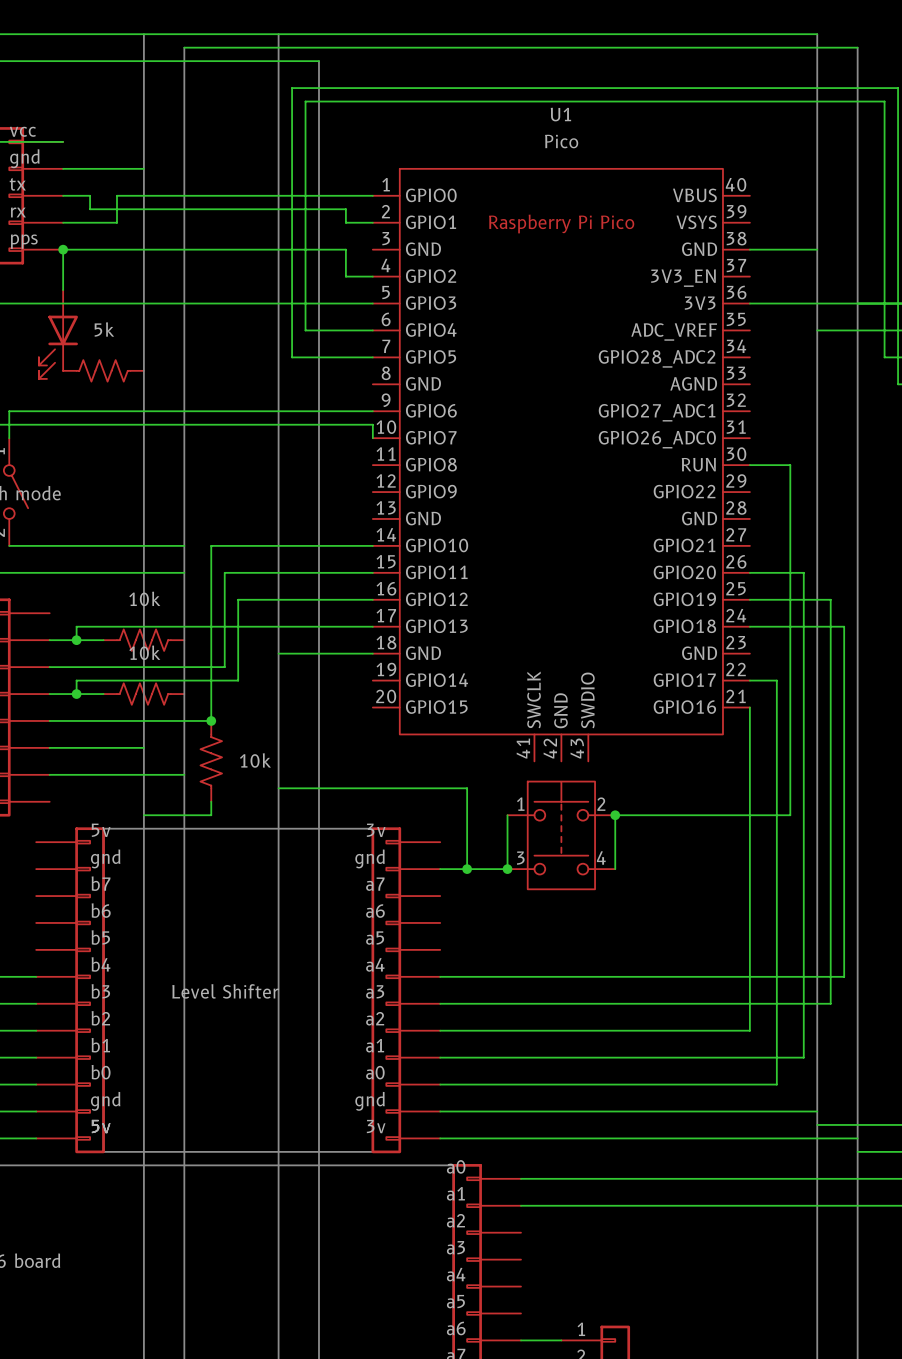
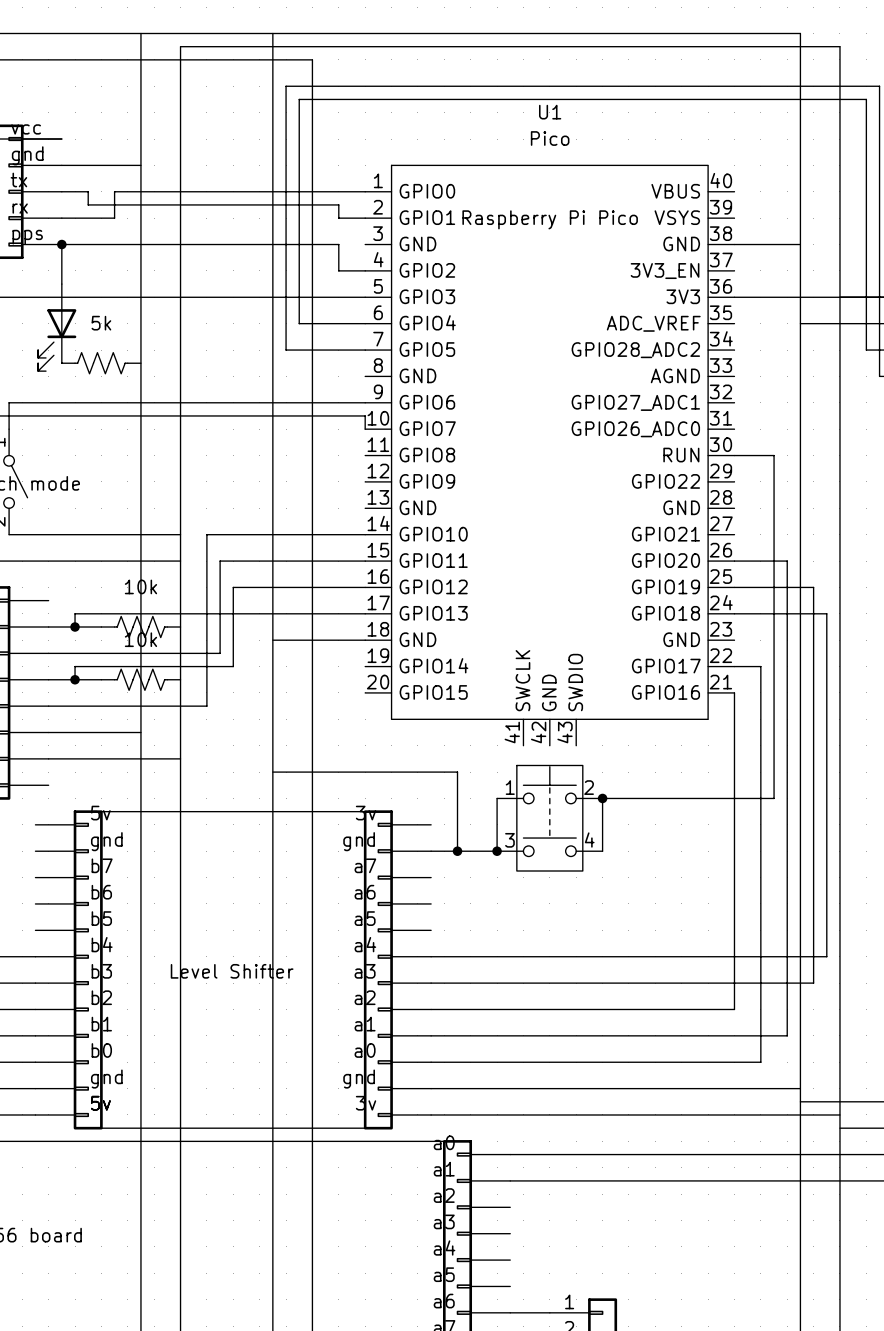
junction: (211, 720) -> none
part: 10k (211, 761) -> none
wire: (211, 801) (211, 815) (143, 815) -> none

